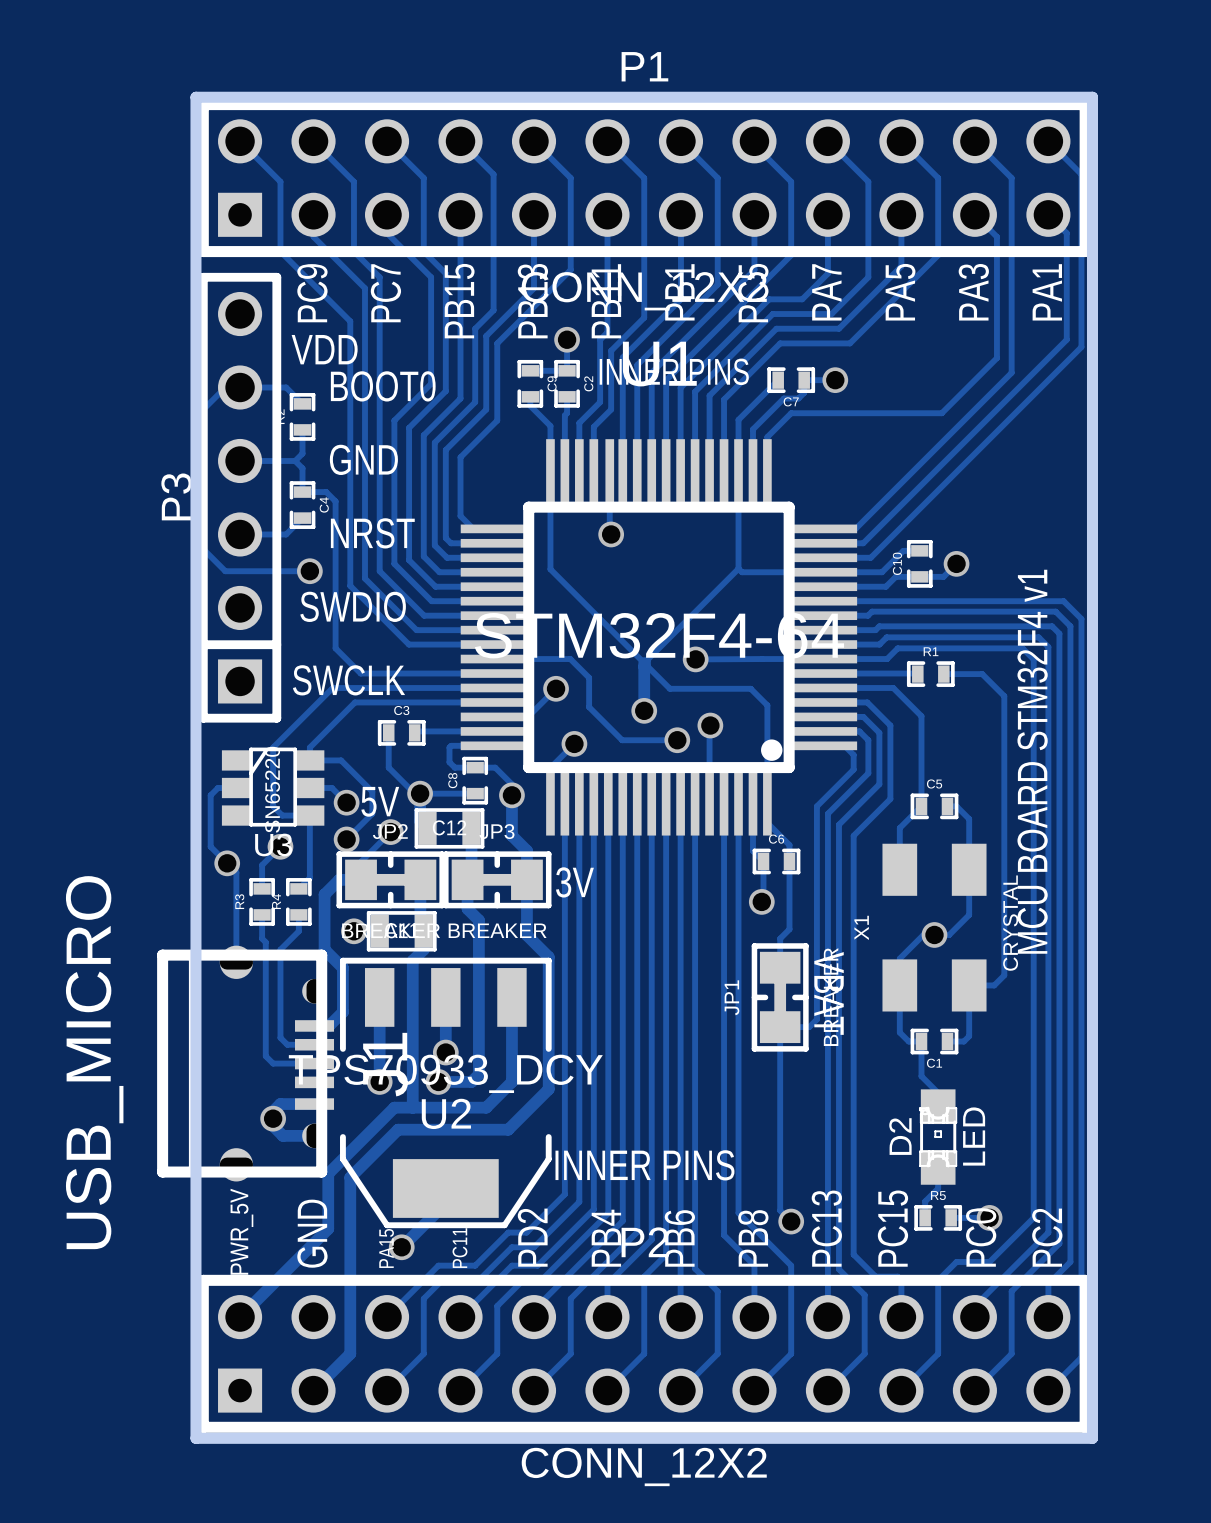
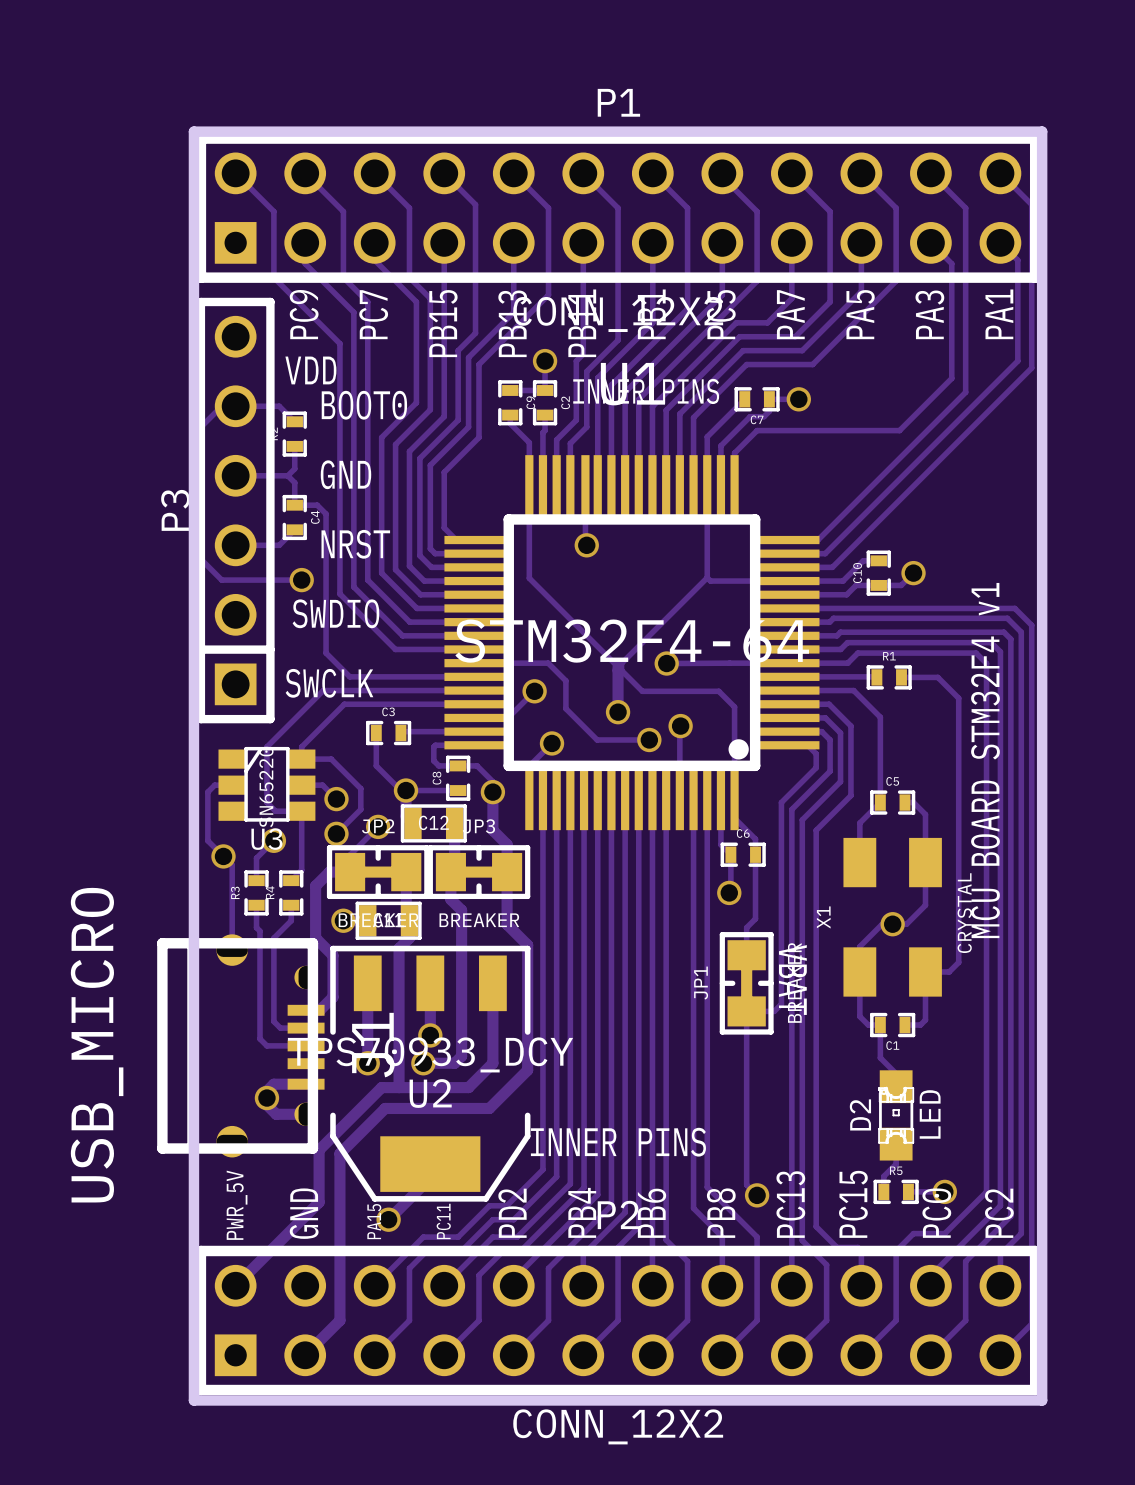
text: 5V (380, 801) -> none
text: 3V (574, 882) -> none

